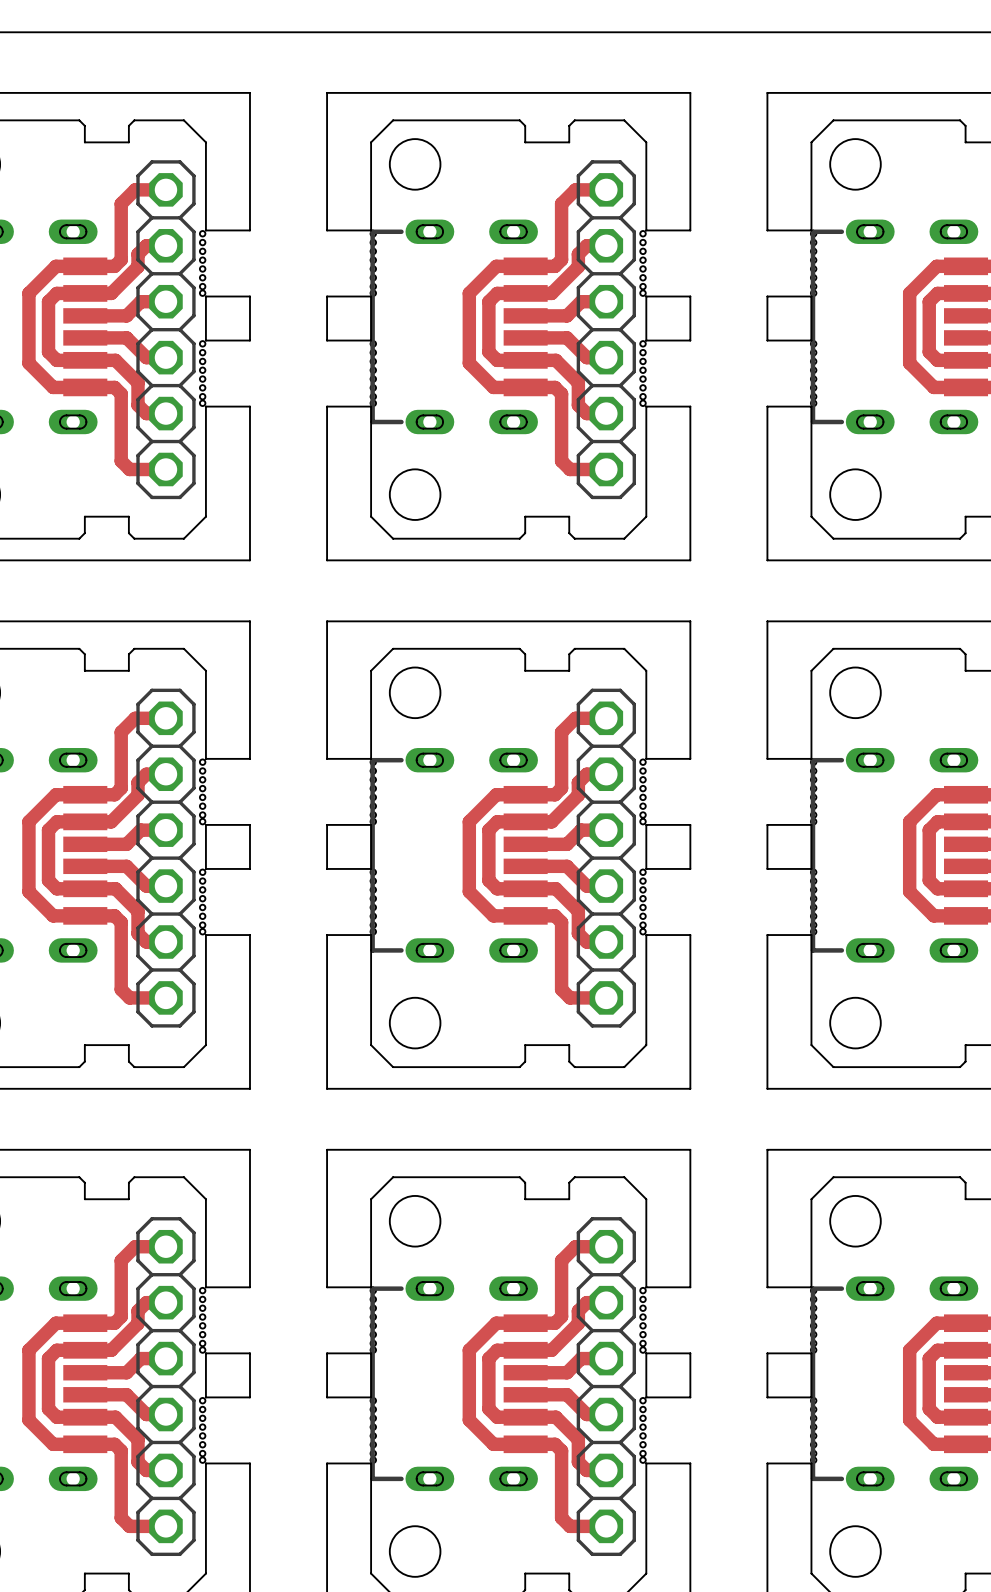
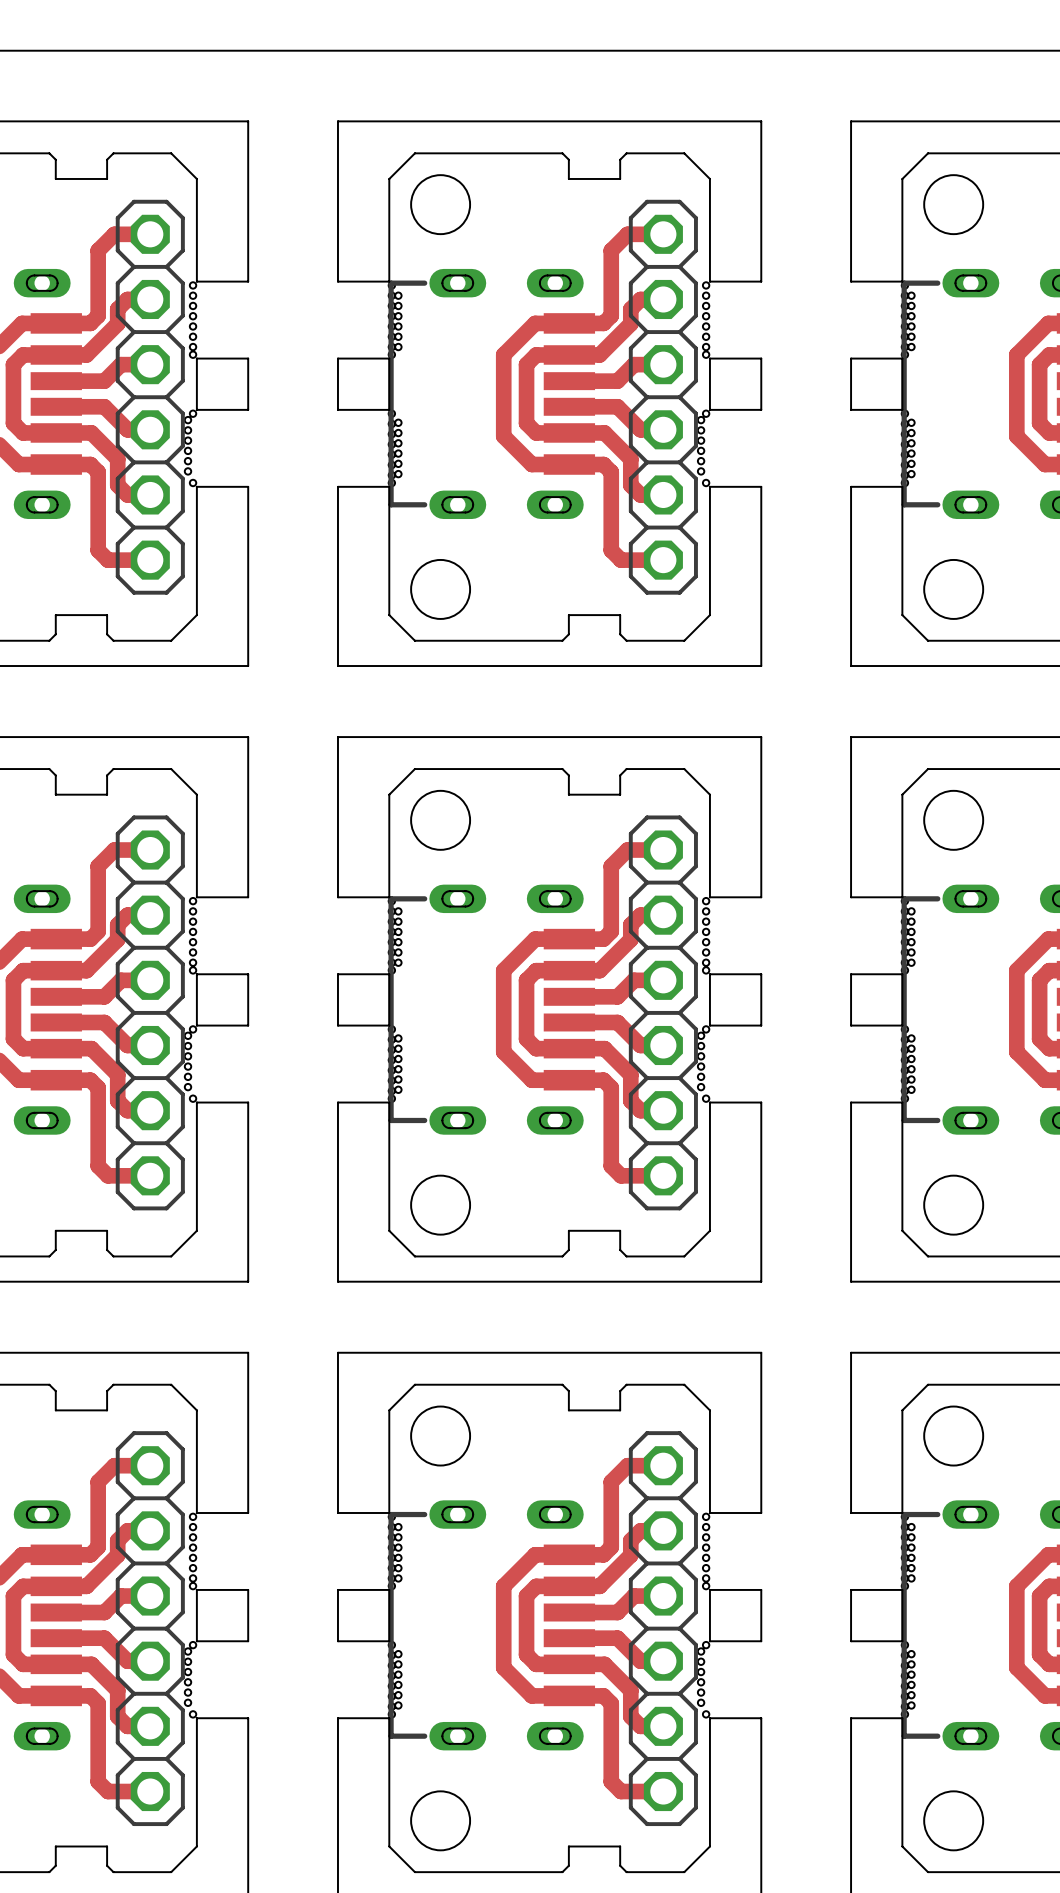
hole: none -> (398, 295)
hole: none -> (911, 295)
hole: none -> (398, 305)
hole: none -> (911, 305)
hole: none -> (398, 316)
hole: none -> (911, 316)
hole: none -> (398, 326)
hole: none -> (911, 326)
hole: none -> (398, 336)
hole: none -> (911, 336)
hole: none -> (398, 347)
hole: none -> (911, 347)
hole: none -> (188, 420)
hole: none -> (701, 420)
hole: none -> (398, 422)
hole: none -> (911, 422)
hole: (202, 352) -> none
hole: (643, 352) -> none
hole: none -> (188, 430)
hole: none -> (701, 430)
hole: none -> (398, 433)
hole: none -> (911, 433)
hole: (202, 361) -> none
hole: (643, 361) -> none
hole: none -> (188, 440)
hole: none -> (701, 440)
hole: none -> (398, 443)
hole: none -> (911, 443)
hole: (202, 370) -> none
hole: (643, 370) -> none
hole: none -> (188, 450)
hole: none -> (701, 450)
hole: none -> (398, 453)
hole: none -> (911, 453)
hole: (202, 379) -> none
hole: (643, 379) -> none
hole: none -> (188, 461)
hole: none -> (701, 461)
hole: none -> (398, 463)
hole: none -> (911, 463)
hole: (202, 387) -> none
hole: (643, 387) -> none
hole: none -> (188, 471)
hole: none -> (701, 471)
hole: none -> (398, 474)
hole: none -> (911, 474)
hole: (202, 396) -> none
hole: (643, 396) -> none
hole: none -> (398, 911)
hole: none -> (911, 911)
hole: none -> (398, 921)
hole: none -> (911, 921)
hole: none -> (398, 931)
hole: none -> (911, 931)
hole: none -> (398, 942)
hole: none -> (911, 942)
hole: none -> (398, 952)
hole: none -> (911, 952)
hole: none -> (398, 962)
hole: none -> (911, 962)
hole: none -> (188, 1035)
hole: none -> (701, 1035)
hole: none -> (398, 1038)
hole: none -> (911, 1038)
hole: (202, 881) -> none
hole: (643, 881) -> none
hole: none -> (188, 1046)
hole: none -> (701, 1046)
hole: none -> (398, 1048)
hole: none -> (911, 1048)
hole: (202, 889) -> none
hole: (643, 889) -> none
hole: none -> (188, 1056)
hole: none -> (701, 1056)
hole: none -> (398, 1058)
hole: none -> (911, 1058)
hole: (202, 898) -> none
hole: (643, 898) -> none
hole: none -> (188, 1066)
hole: none -> (701, 1066)
hole: none -> (398, 1069)
hole: none -> (911, 1069)
hole: (202, 907) -> none
hole: (643, 907) -> none
hole: none -> (188, 1076)
hole: none -> (701, 1076)
hole: none -> (398, 1079)
hole: none -> (911, 1079)
hole: (202, 916) -> none
hole: (643, 916) -> none
hole: none -> (188, 1087)
hole: none -> (701, 1087)
hole: none -> (398, 1089)
hole: none -> (911, 1089)
hole: (202, 925) -> none
hole: (643, 925) -> none
hole: none -> (398, 1527)
hole: none -> (911, 1527)
hole: none -> (398, 1537)
hole: none -> (911, 1537)
hole: none -> (398, 1547)
hole: none -> (911, 1547)
hole: none -> (398, 1557)
hole: none -> (911, 1557)
hole: none -> (398, 1568)
hole: none -> (911, 1568)
hole: none -> (398, 1578)
hole: none -> (911, 1578)
hole: none -> (188, 1651)
hole: none -> (701, 1651)
hole: none -> (398, 1654)
hole: none -> (911, 1654)
hole: (202, 1409) -> none
hole: (643, 1409) -> none
hole: none -> (188, 1661)
hole: none -> (701, 1661)
hole: none -> (398, 1664)
hole: none -> (911, 1664)
hole: (202, 1418) -> none
hole: (643, 1418) -> none
hole: none -> (188, 1672)
hole: none -> (701, 1672)
hole: none -> (398, 1674)
hole: none -> (911, 1674)
hole: (202, 1427) -> none
hole: (643, 1427) -> none
hole: none -> (188, 1682)
hole: none -> (701, 1682)
hole: none -> (398, 1684)
hole: none -> (911, 1684)
hole: (202, 1435) -> none
hole: (643, 1435) -> none
hole: none -> (188, 1692)
hole: none -> (701, 1692)
hole: none -> (398, 1695)
hole: none -> (911, 1695)
hole: (202, 1444) -> none
hole: (643, 1444) -> none
hole: none -> (188, 1702)
hole: none -> (701, 1702)
hole: none -> (398, 1705)
hole: none -> (911, 1705)
hole: (202, 1453) -> none
hole: (643, 1453) -> none

